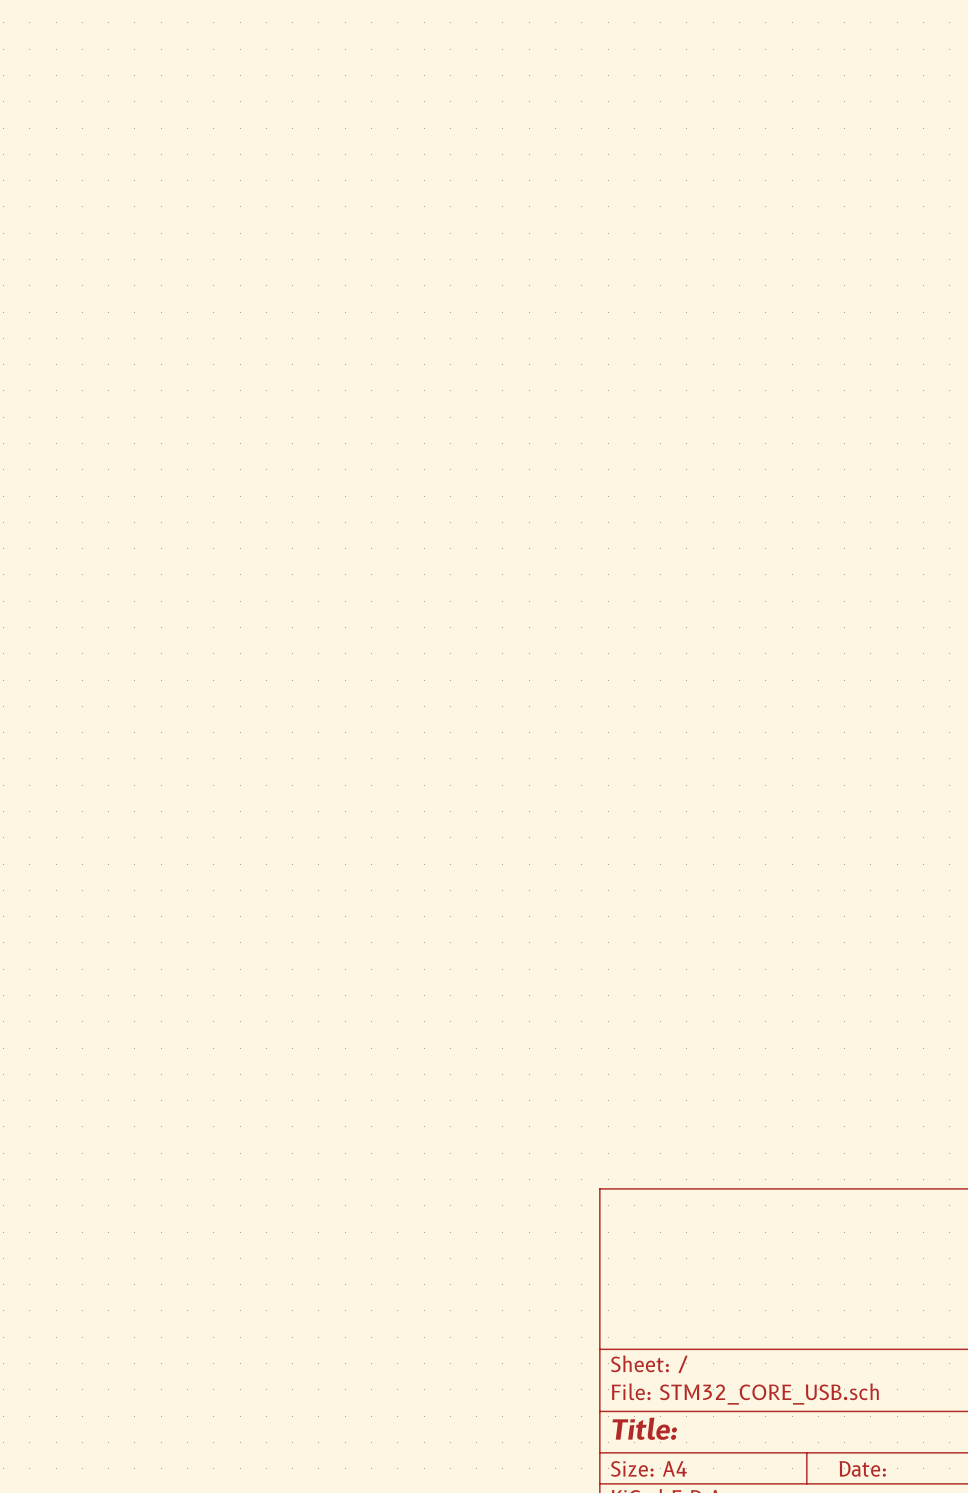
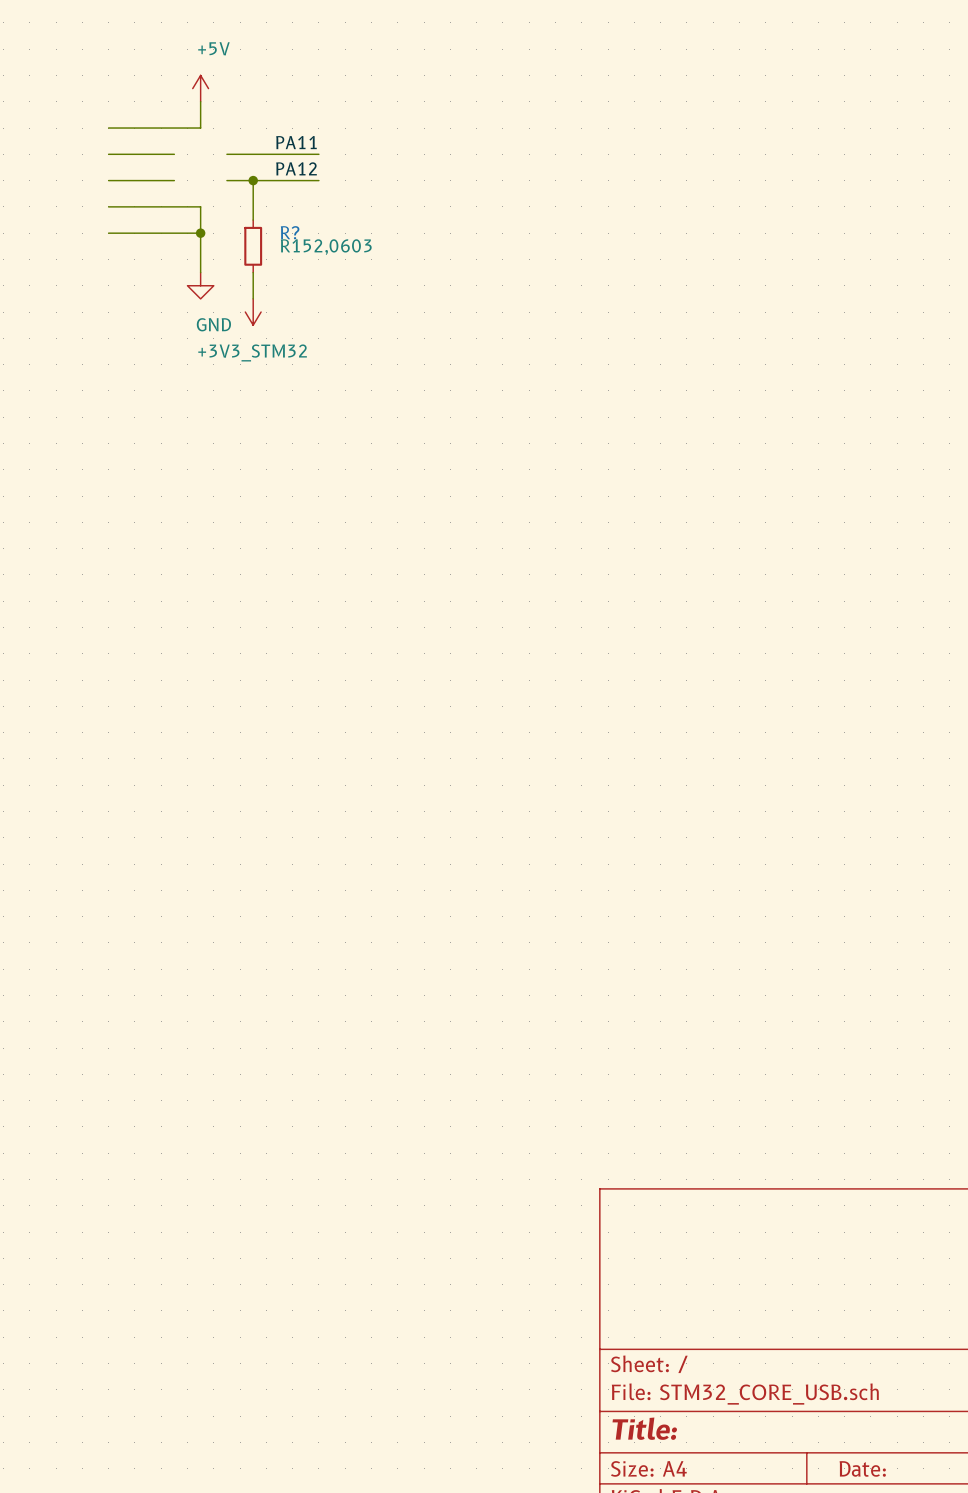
power symbol: none -> +5V (200, 88)
wire: none -> (200, 101) (200, 128) (108, 128)
label: none -> PA11 (296, 142)
wire: none -> (108, 154) (174, 154)
wire: none -> (226, 154) (318, 154)
label: none -> PA12 (296, 168)
wire: none -> (108, 180) (174, 180)
wire: none -> (226, 180) (318, 180)
wire: none -> (253, 180) (253, 220)
junction: none -> (253, 180)
wire: none -> (108, 206) (200, 206) (200, 272)
wire: none -> (108, 233) (200, 233)
junction: none -> (200, 233)
R?: none -> R152,0603 (253, 246)
wire: none -> (253, 272) (253, 298)
power symbol: none -> GND (200, 285)
power symbol: none -> +3V3_STM32 (253, 312)

